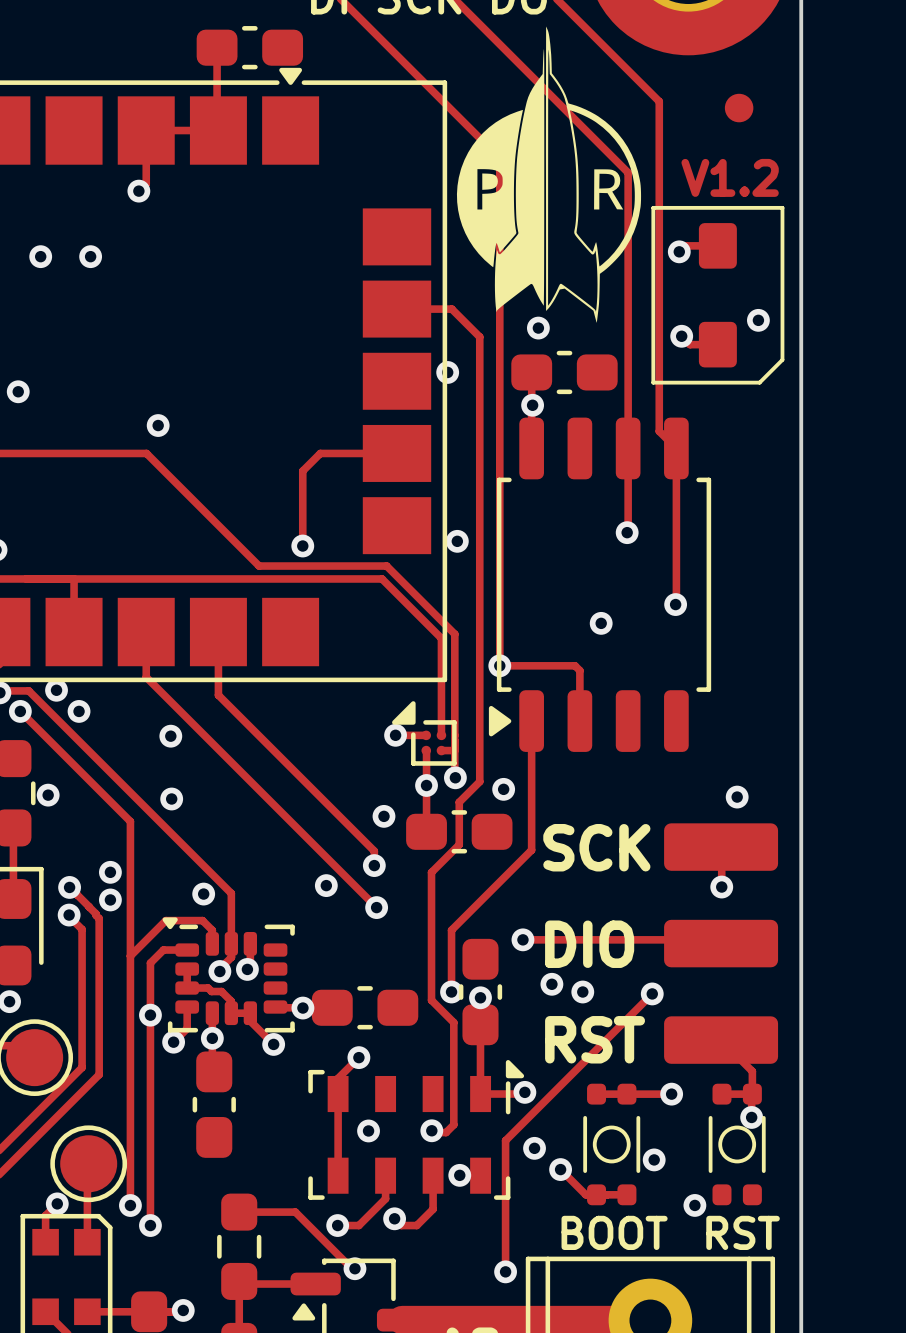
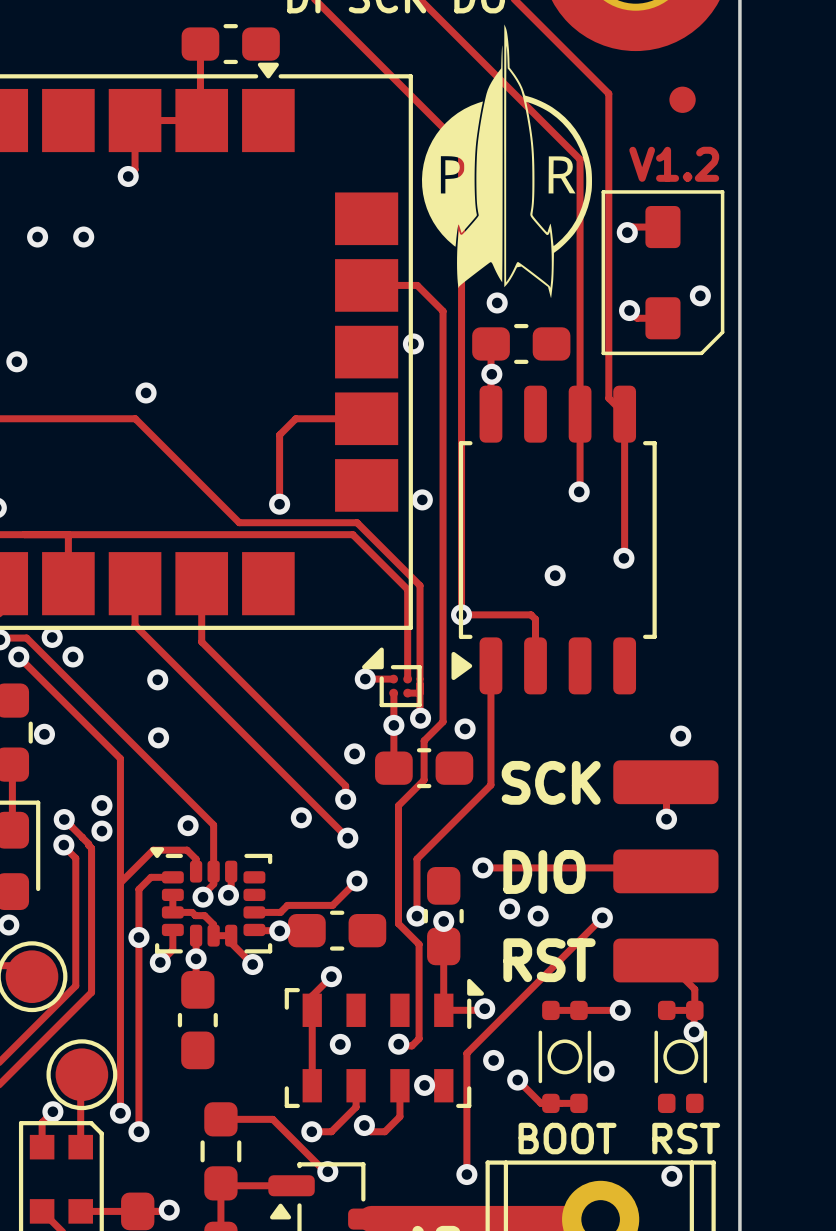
track: none -> (356, 881) (332, 905) (287, 905) (280, 912) (254, 912)
via: none -> (356, 881)
via position: (694, 1205) -> (671, 1176)

